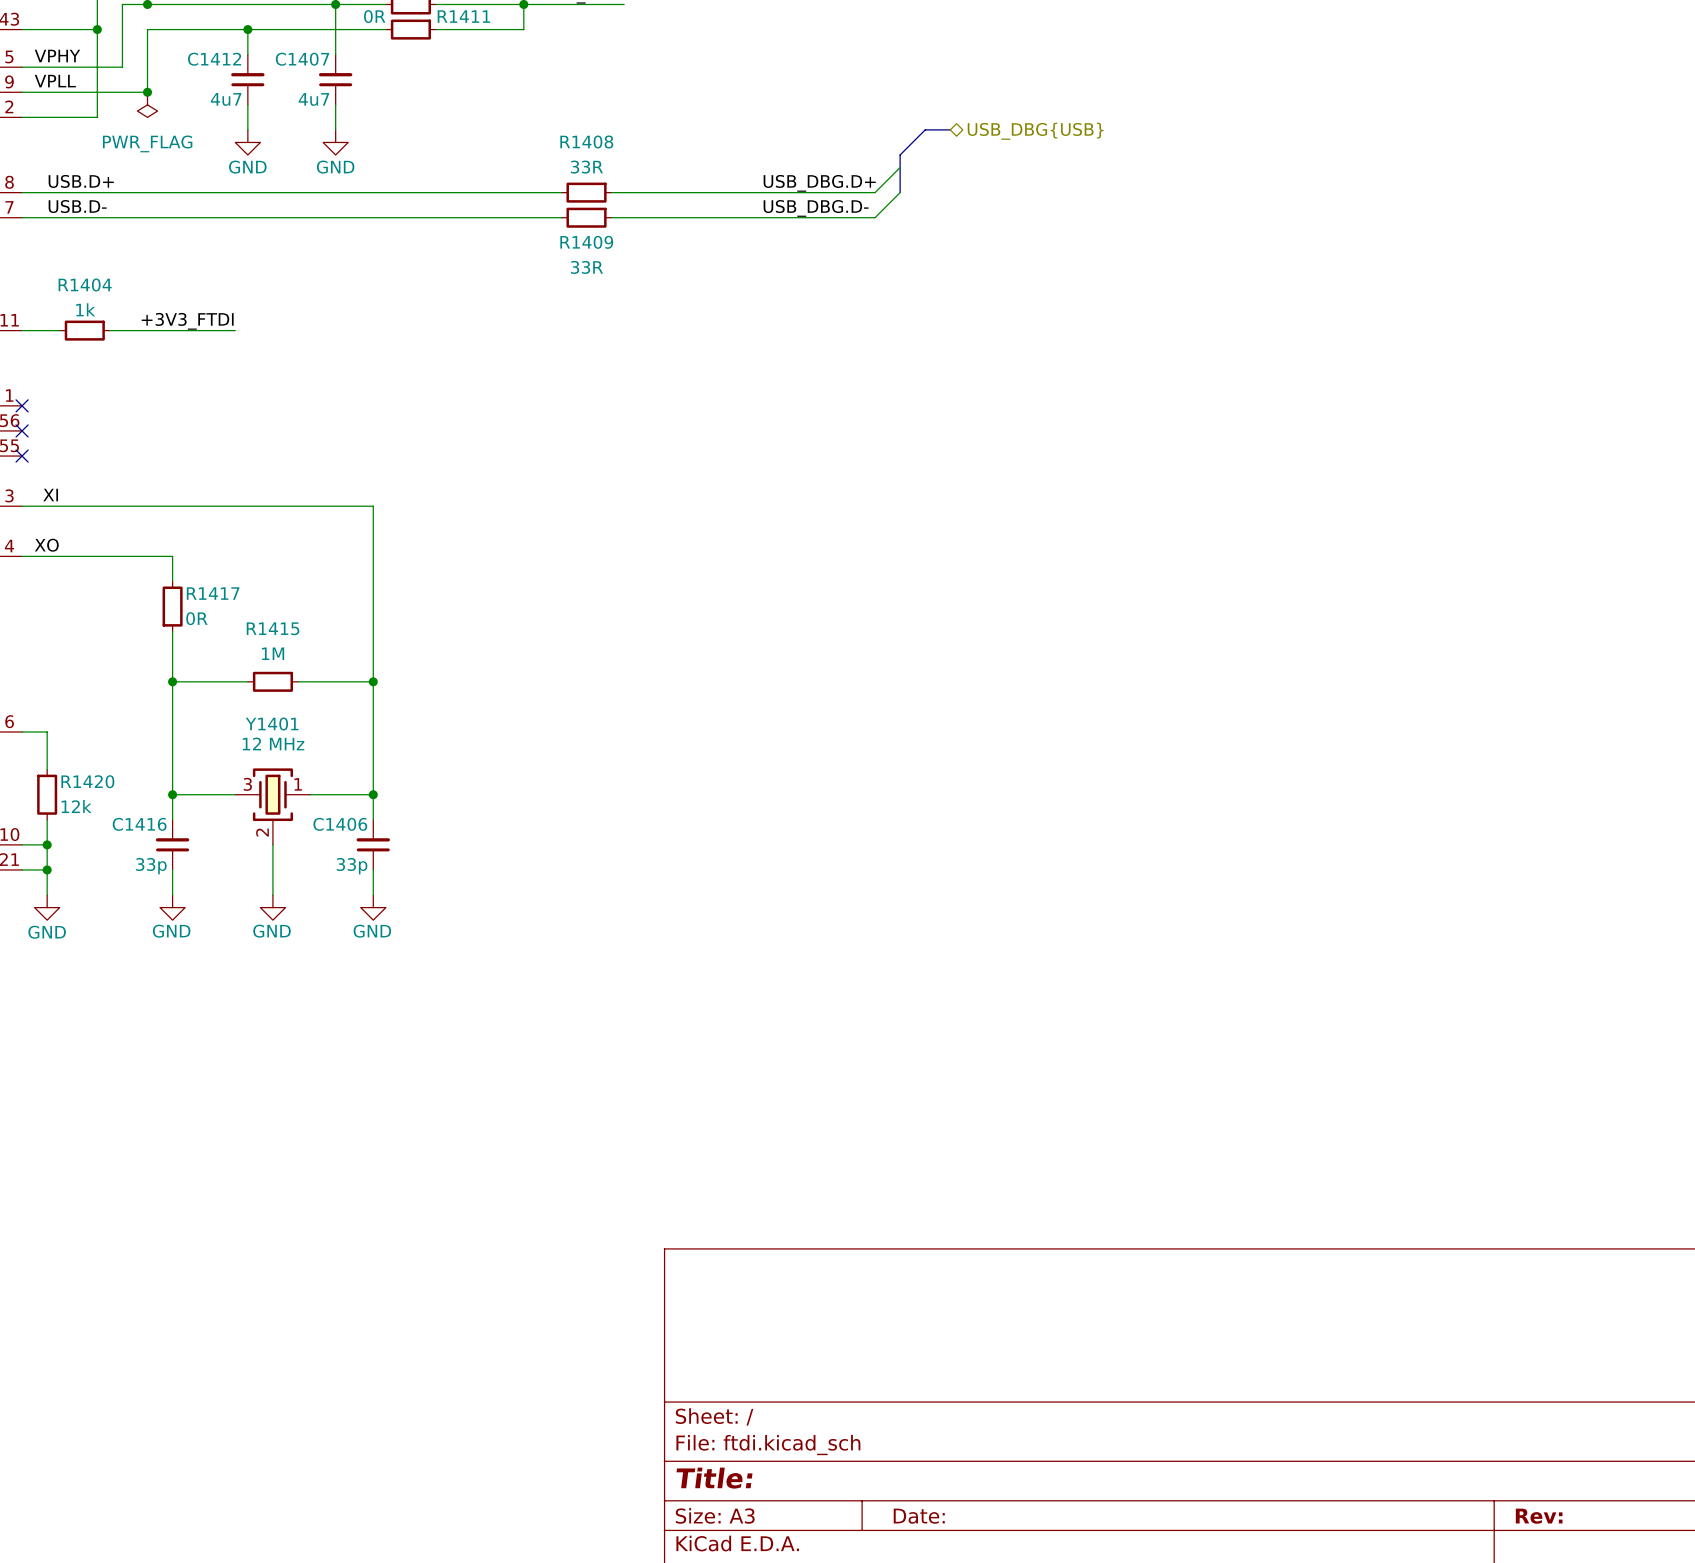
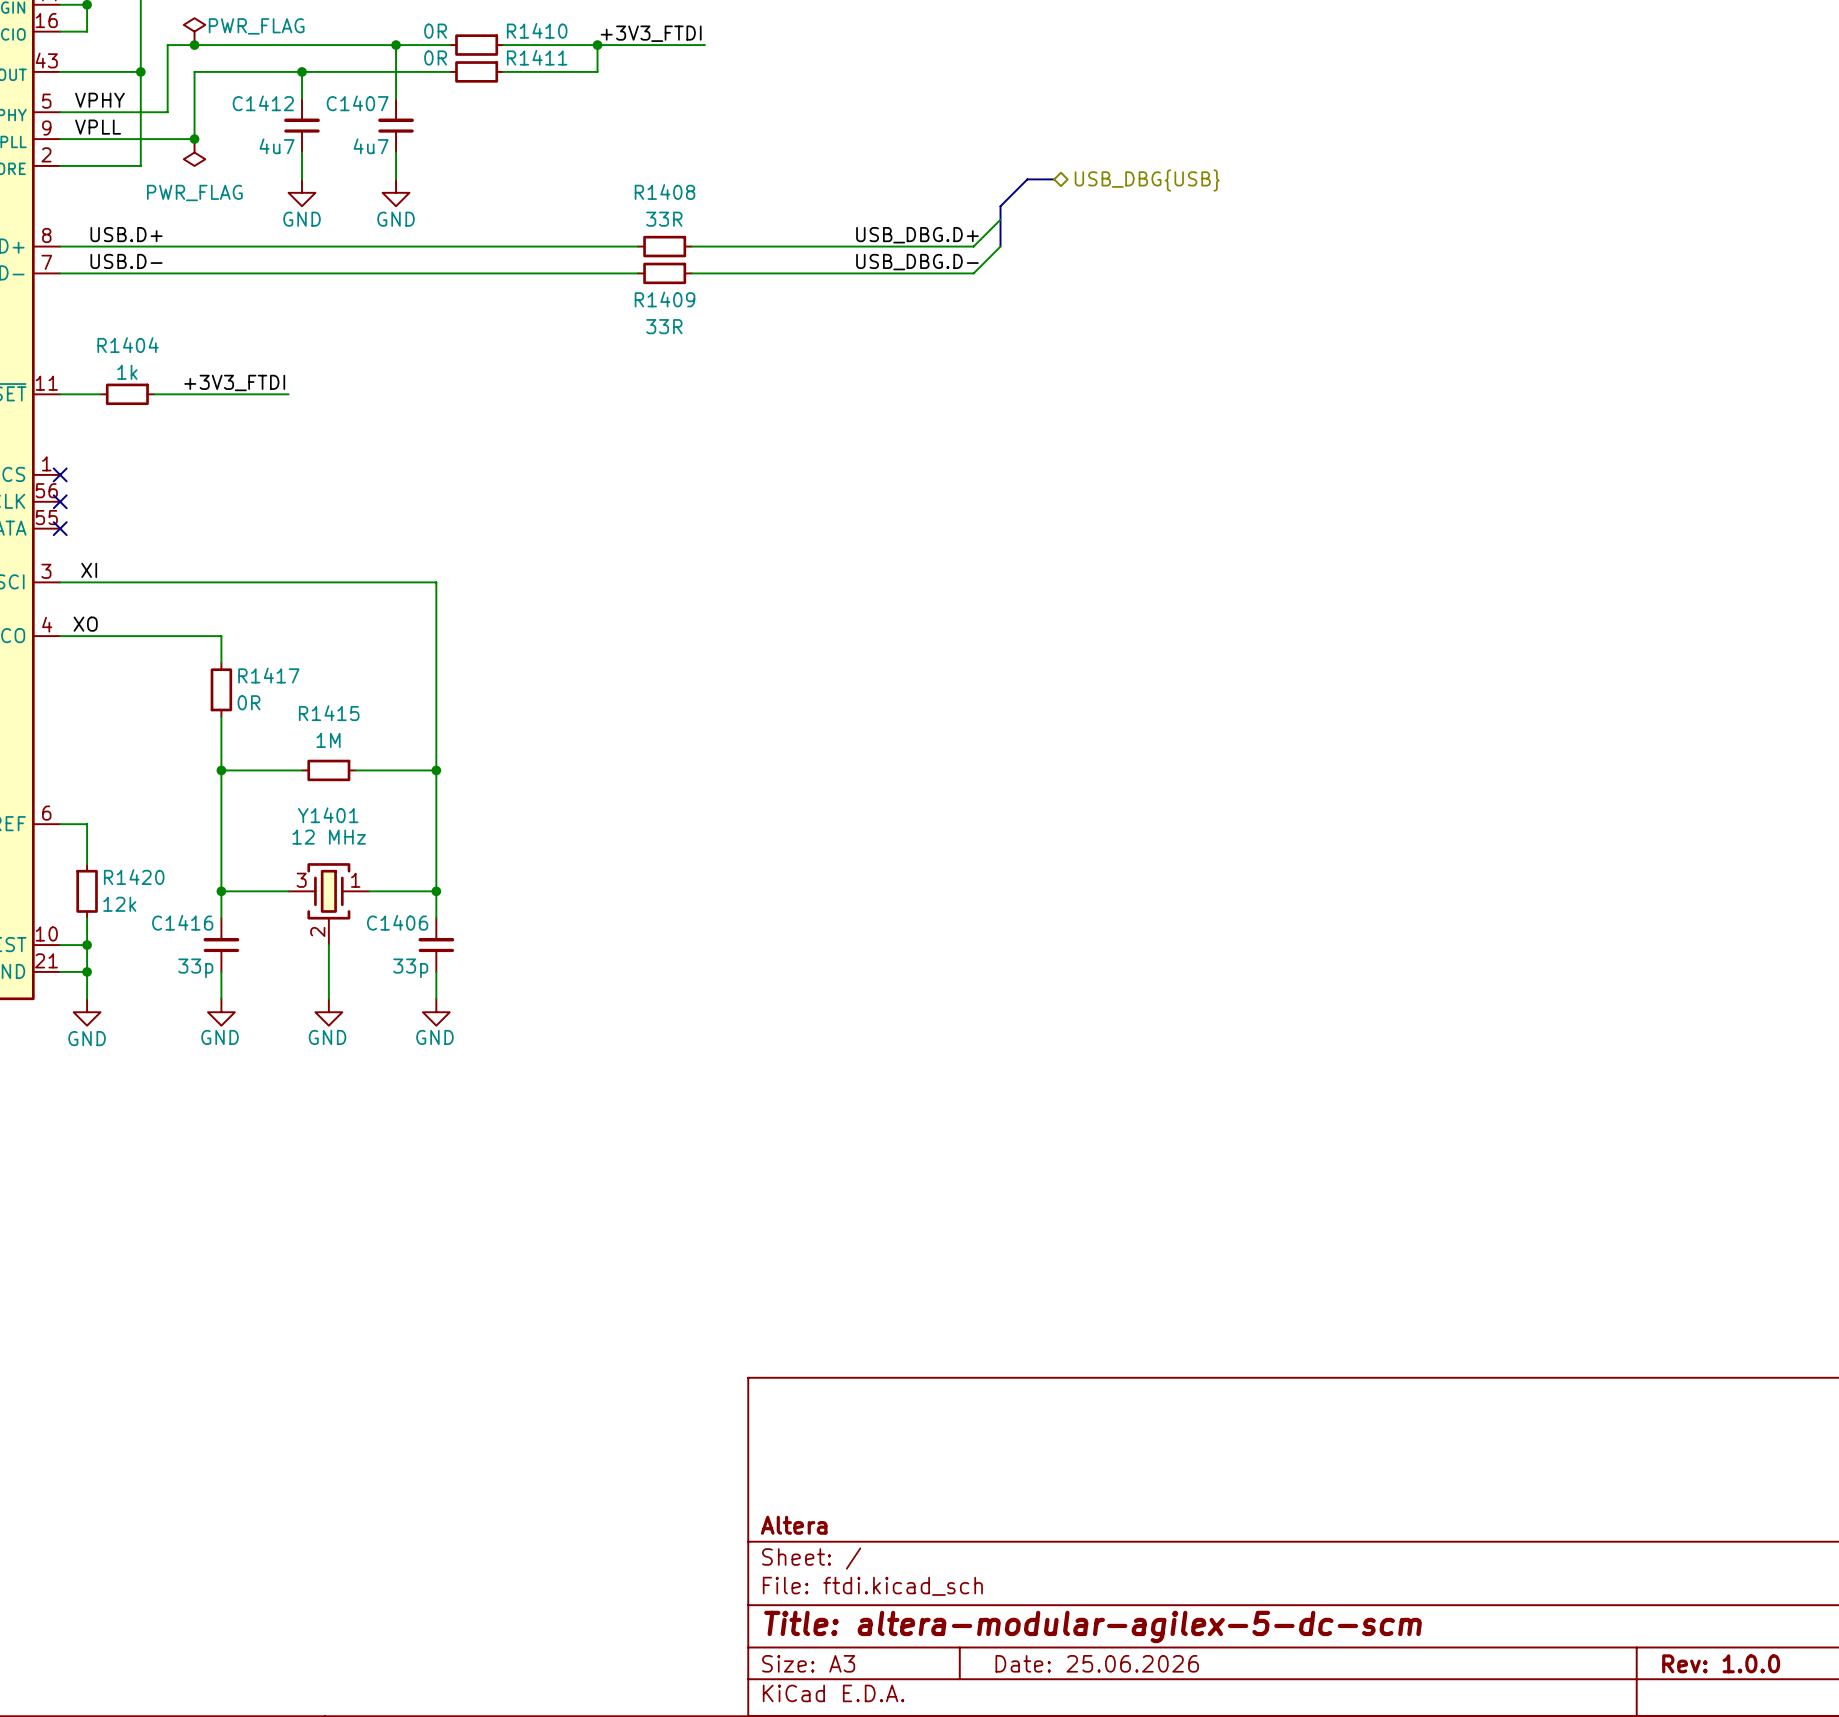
title block: none -> Altera (794, 1525)
title block: Title: (714, 1478) -> Title: altera-modular-agilex-5-dc-scm (1093, 1626)
title block: Date: (919, 1516) -> Date: 25.06.2026 (1097, 1663)
title block: Rev: (1539, 1516) -> Rev: 1.0.0 (1721, 1663)

